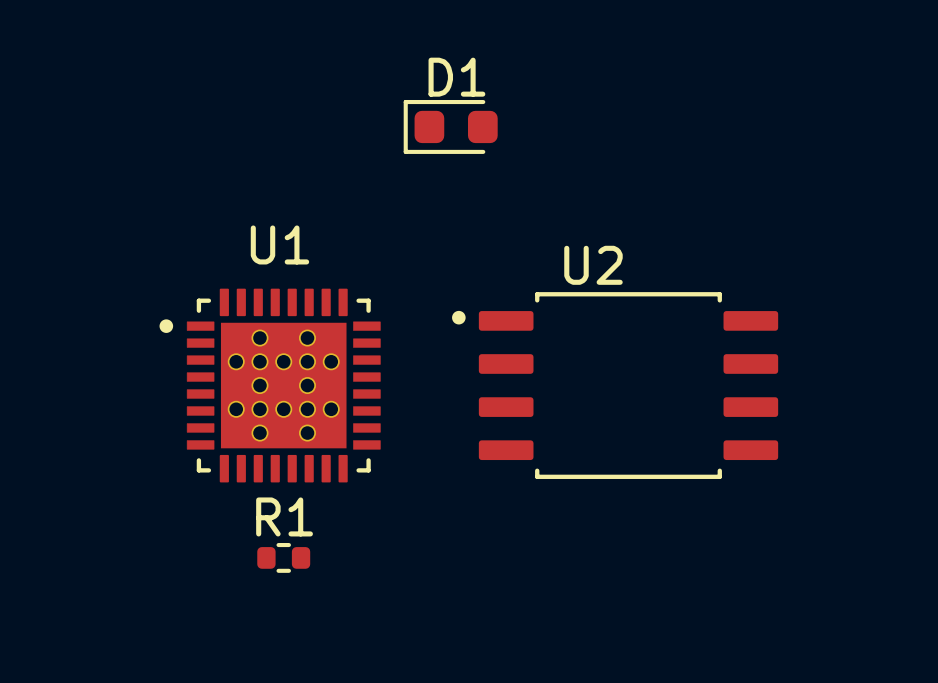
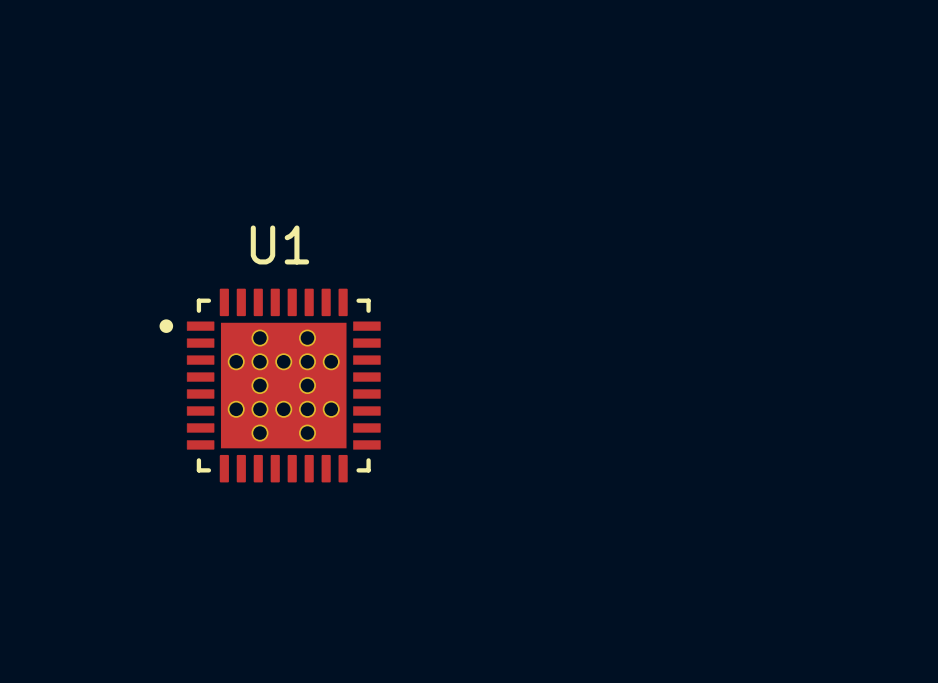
D1: (450, 126) -> none
U2: (615, 385) -> none
R1: (283, 557) -> none

